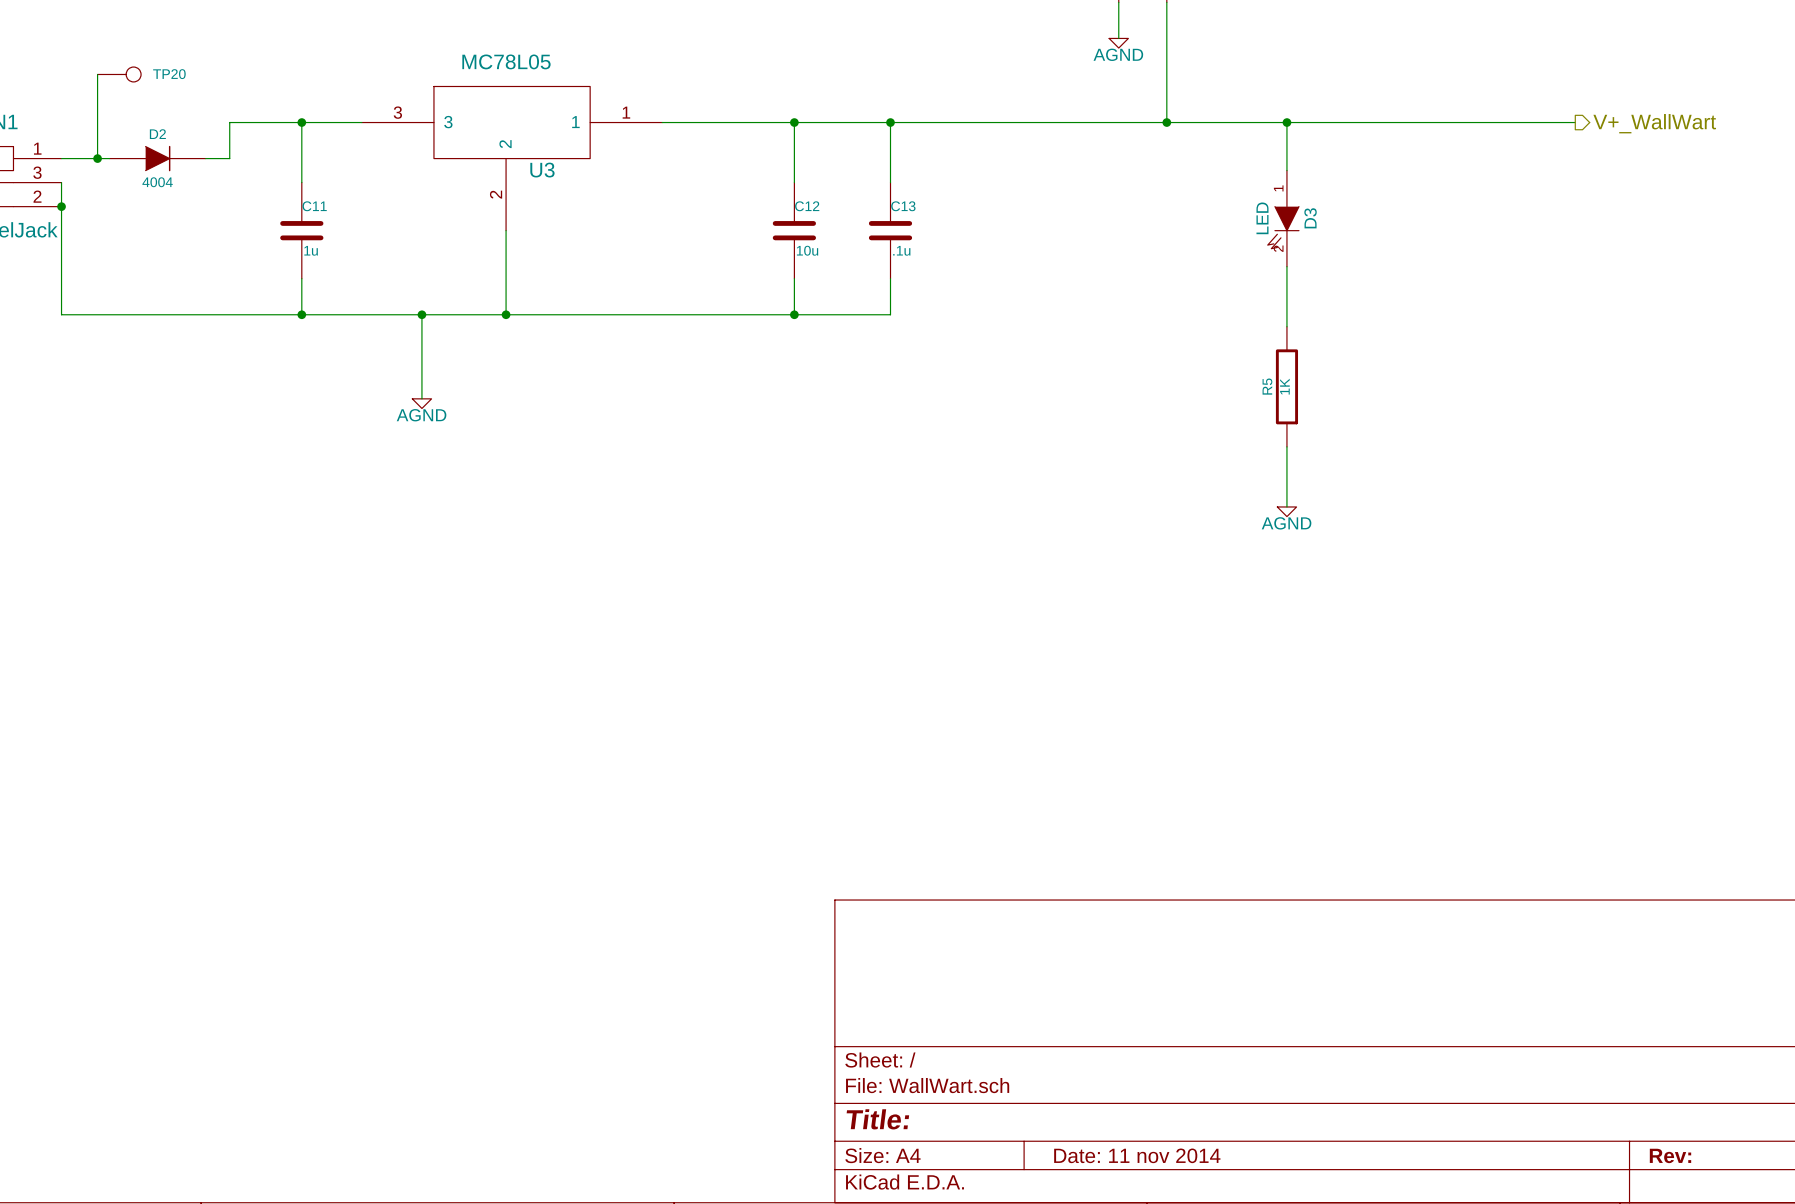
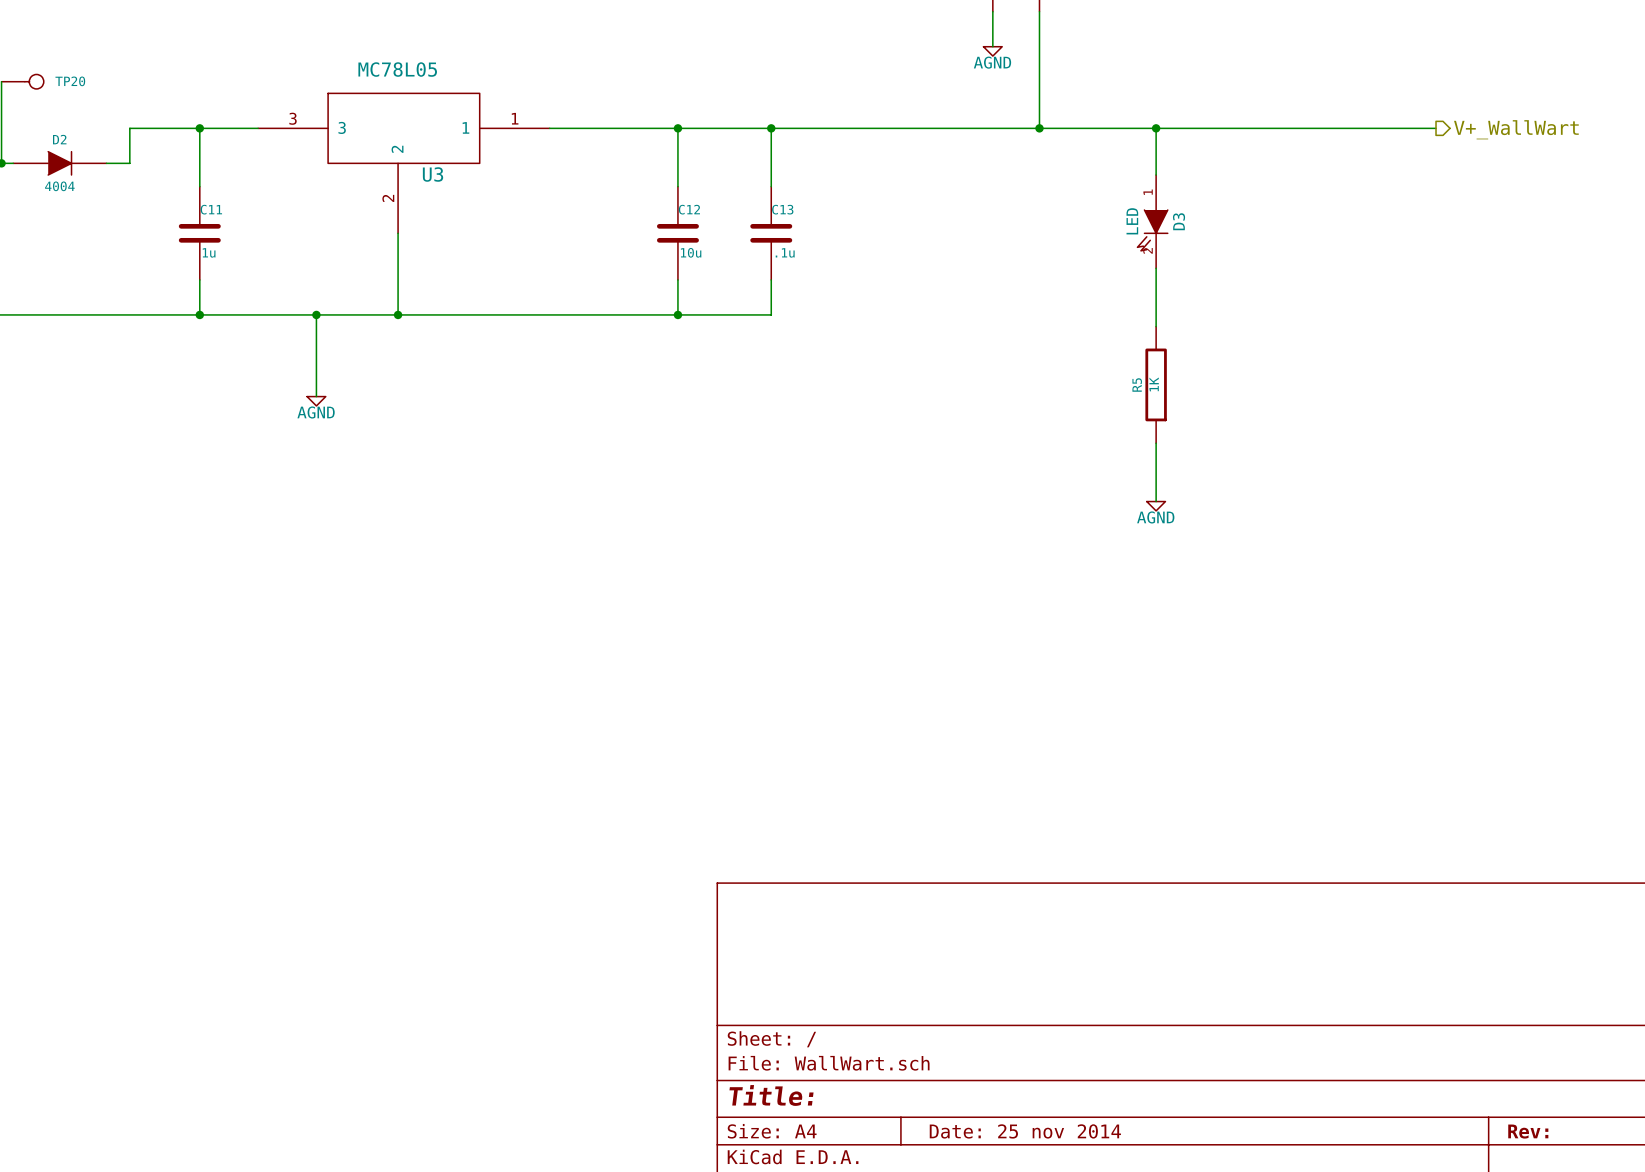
title block: Date: 11 nov 2014 (1137, 1155) -> Date: 25 nov 2014 (1025, 1131)

